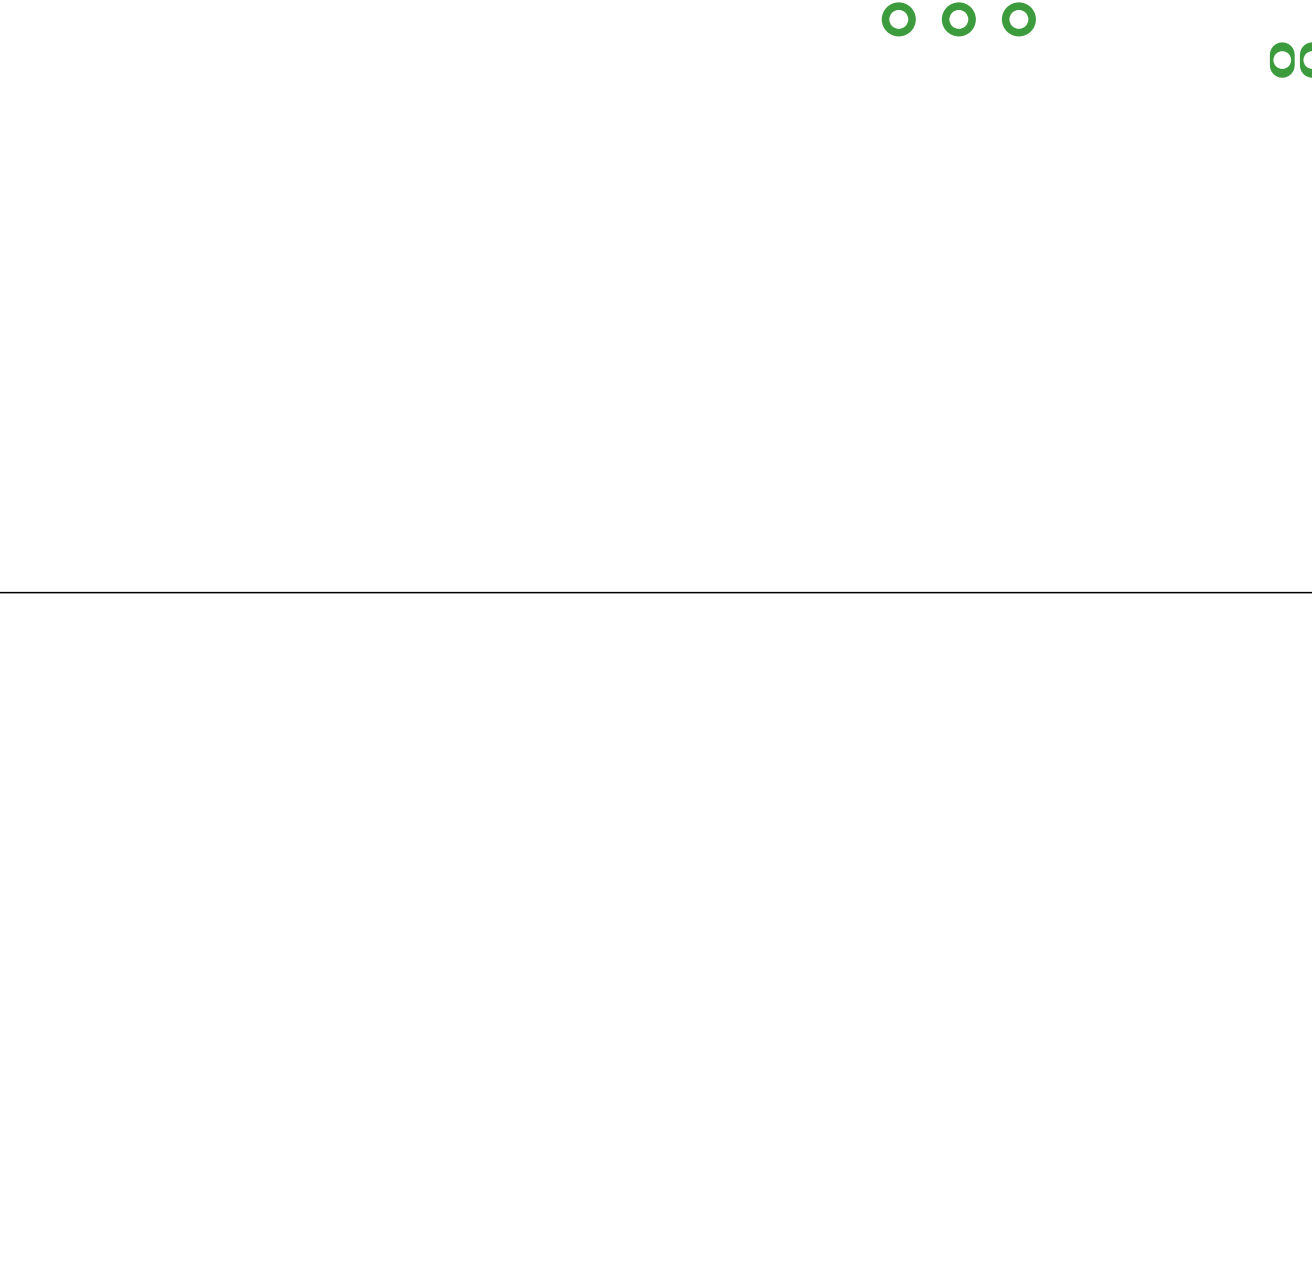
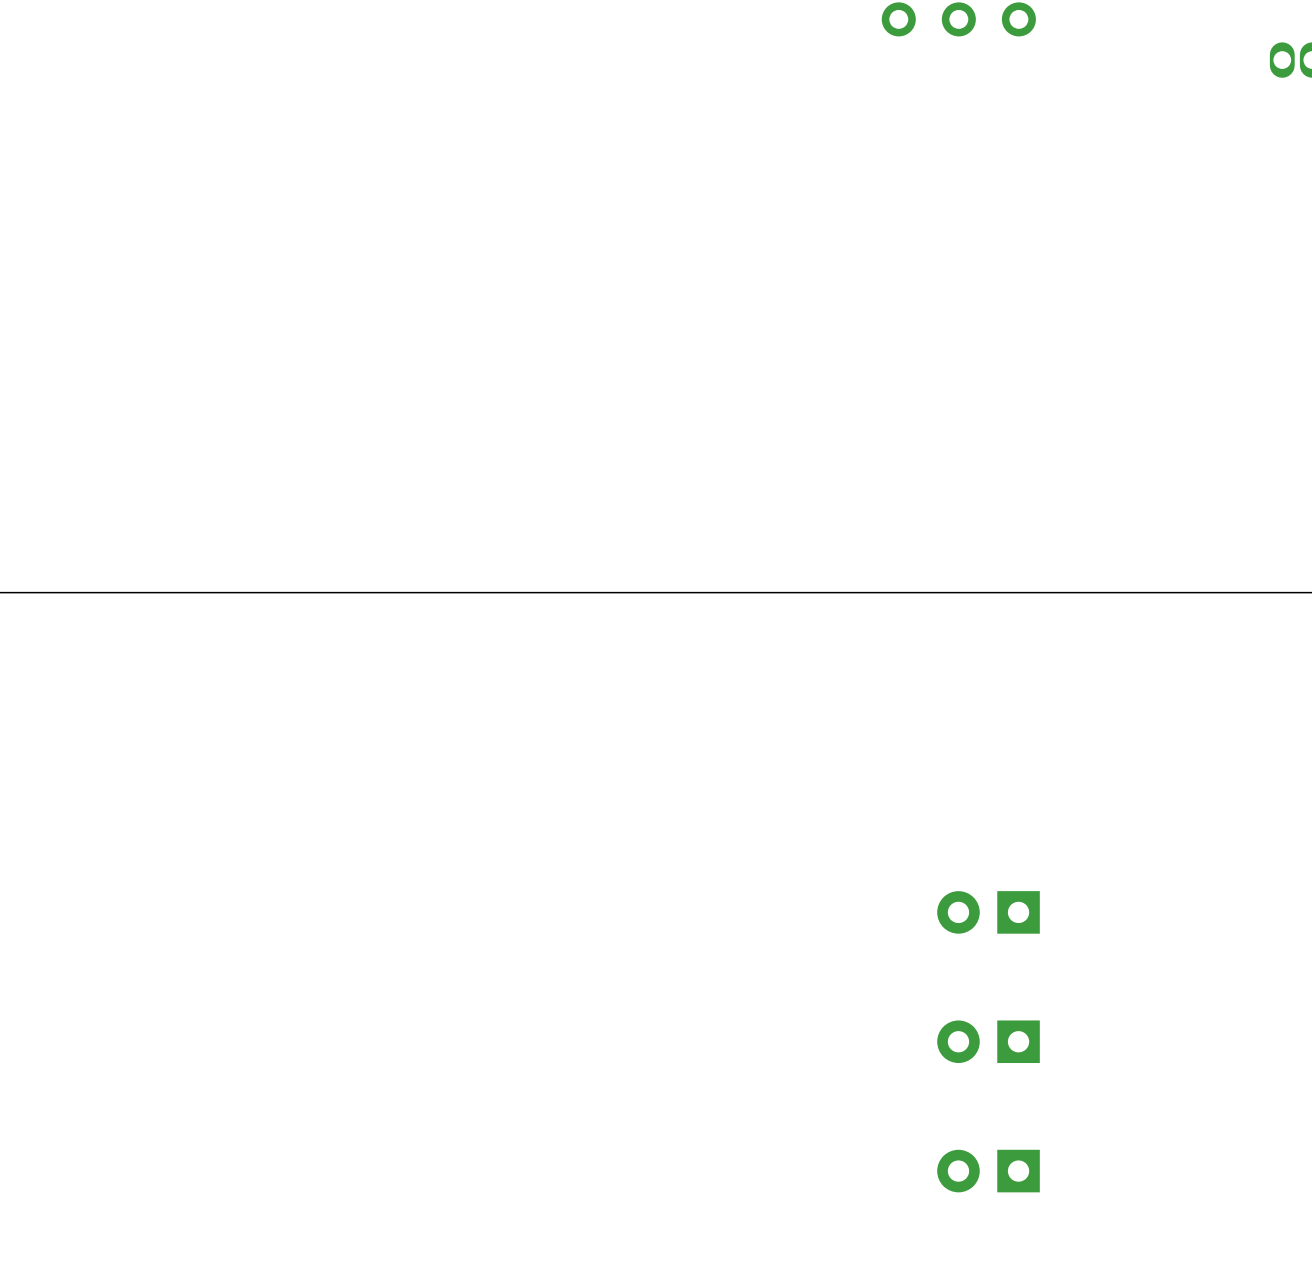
part: none -> (988, 912)
part: none -> (988, 1041)
part: none -> (988, 1171)

